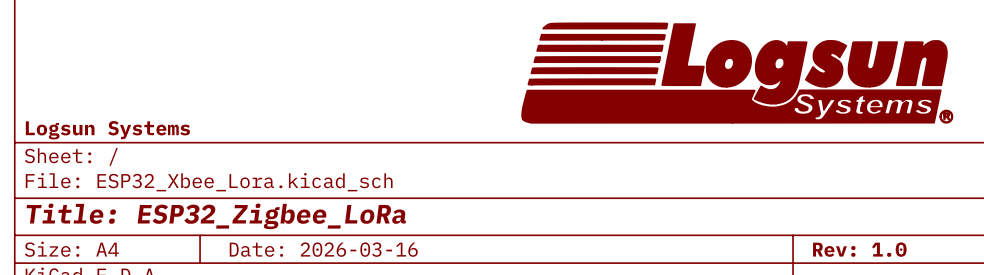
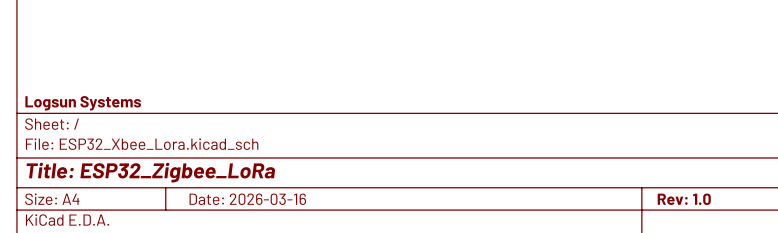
power symbol: (737, 73) -> none

